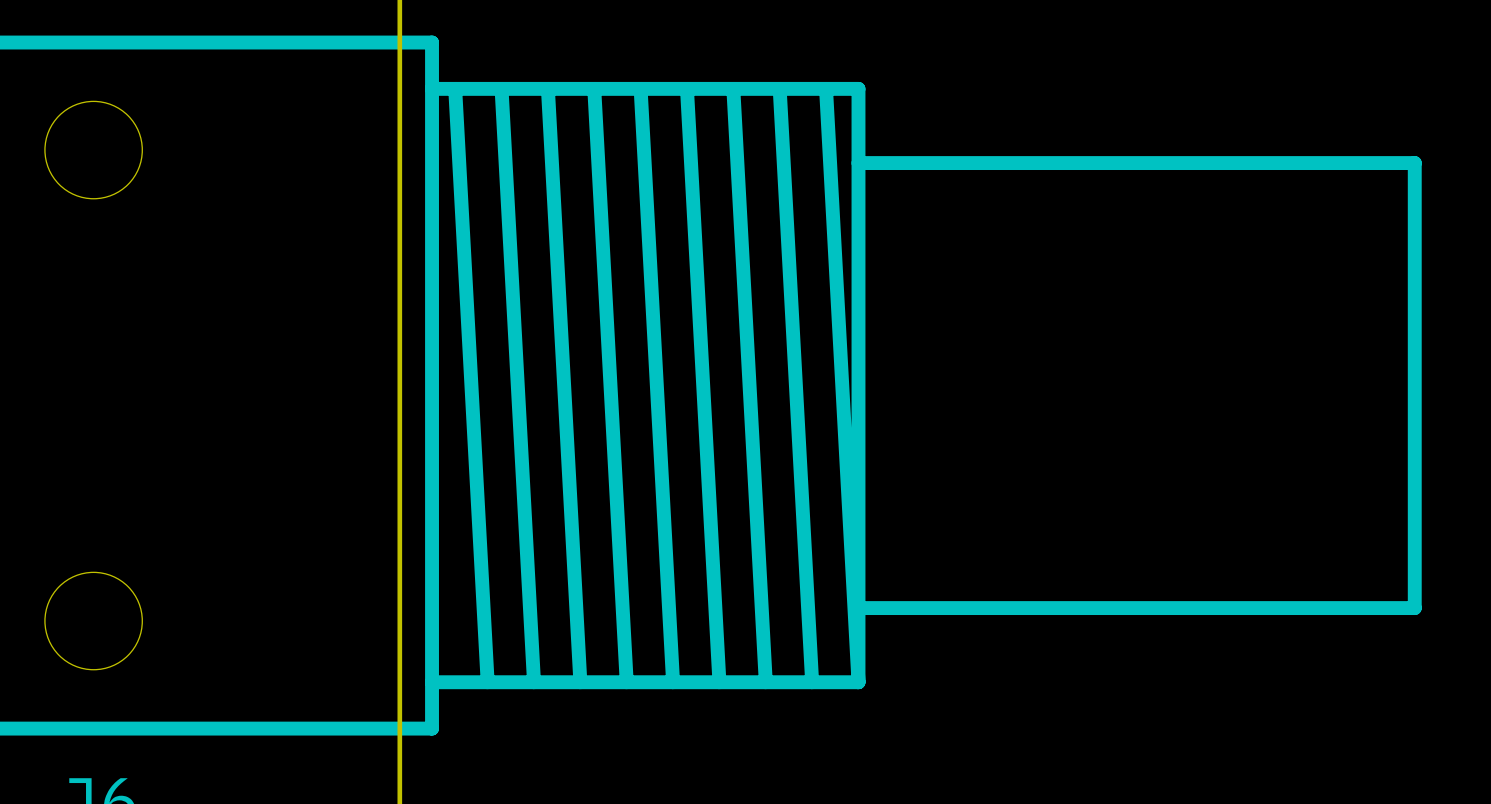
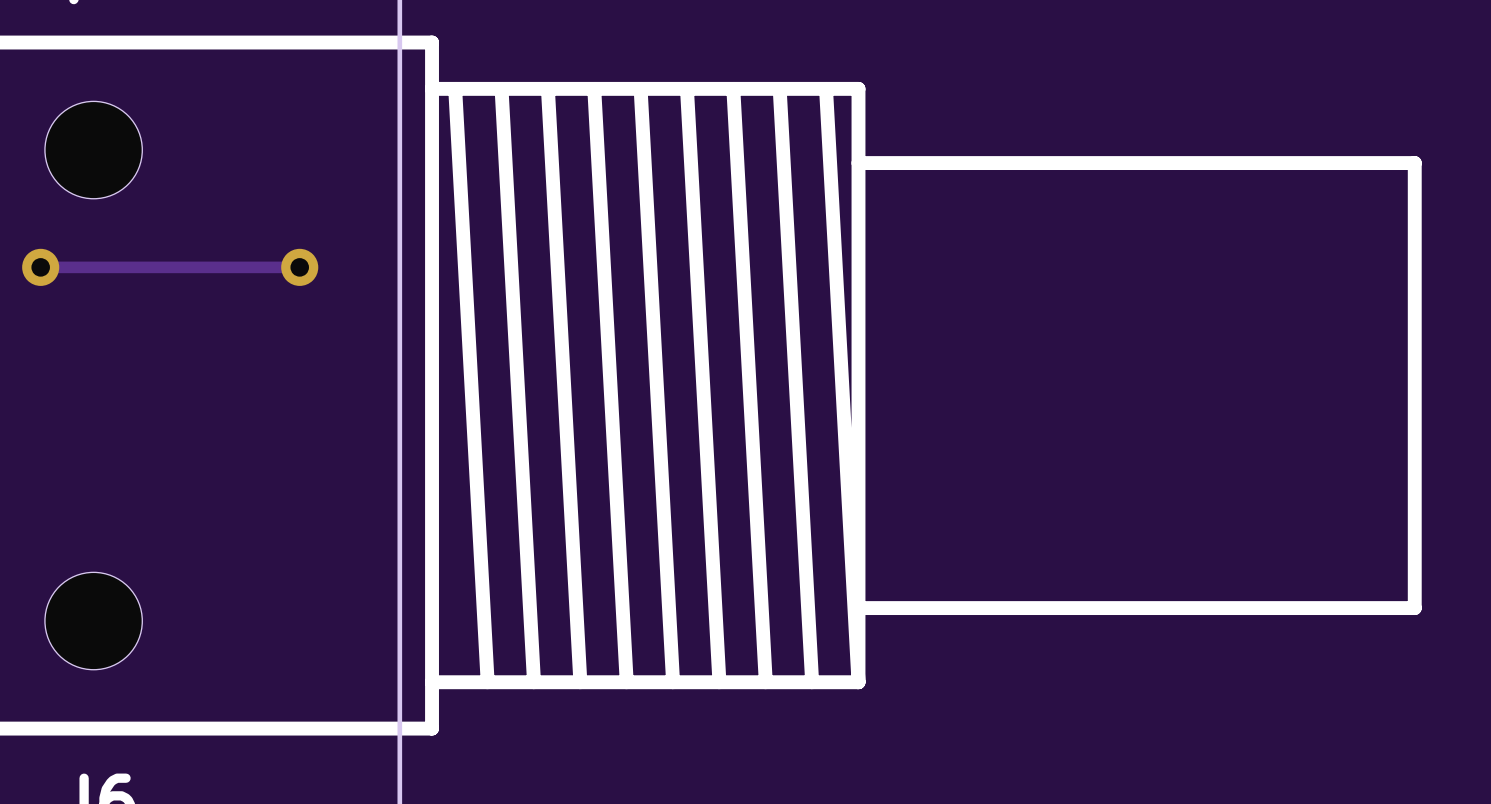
track: none -> (40, 267) (299, 267)
via: none -> (40, 267)
via: none -> (299, 267)

